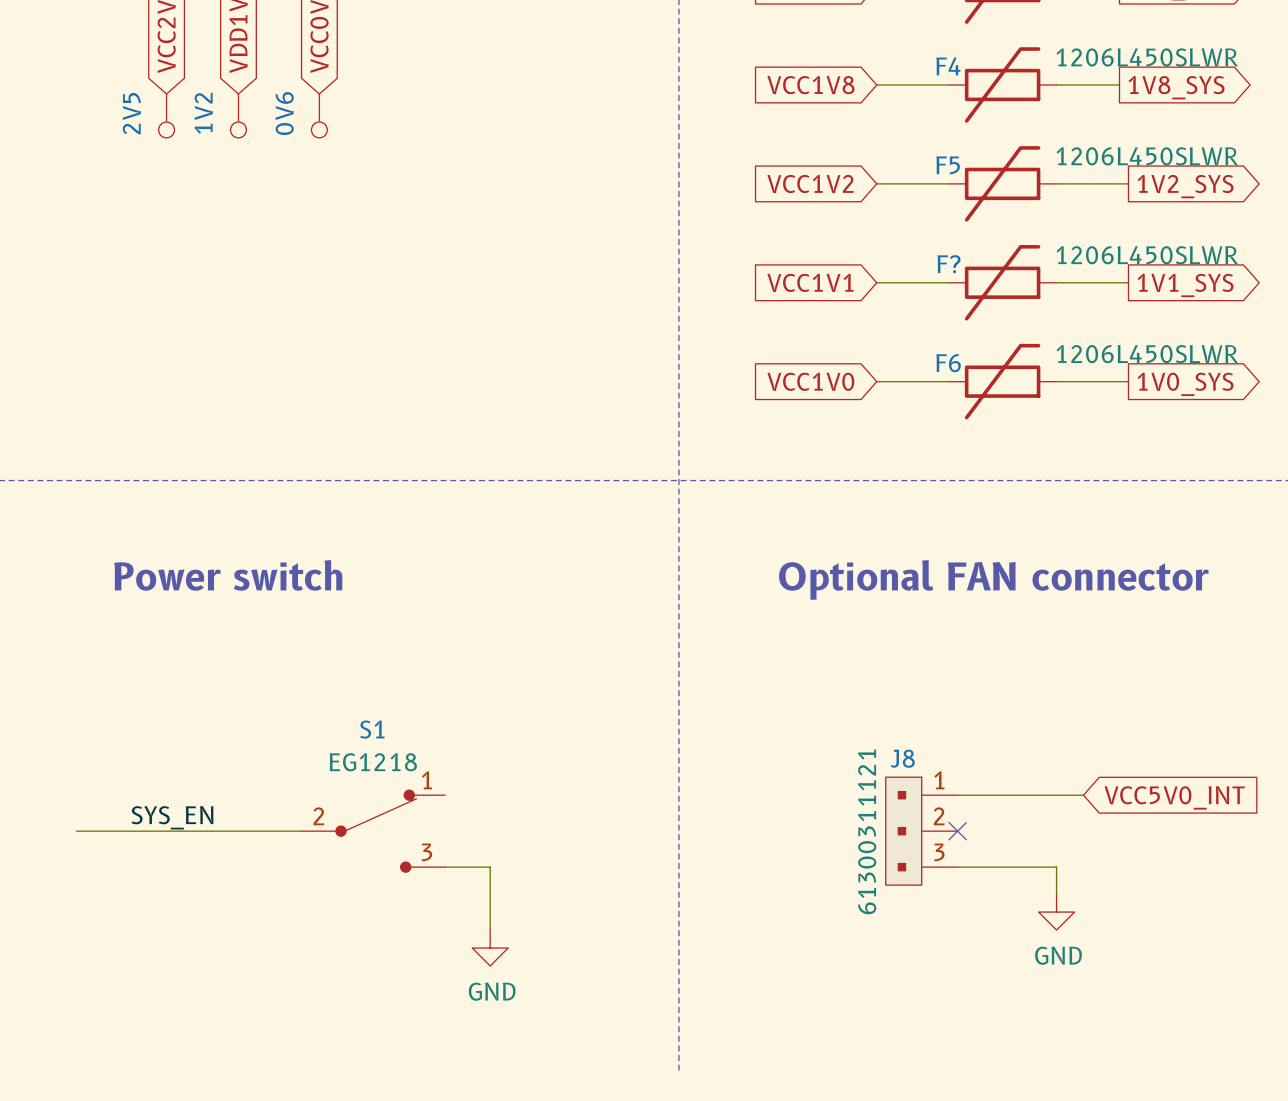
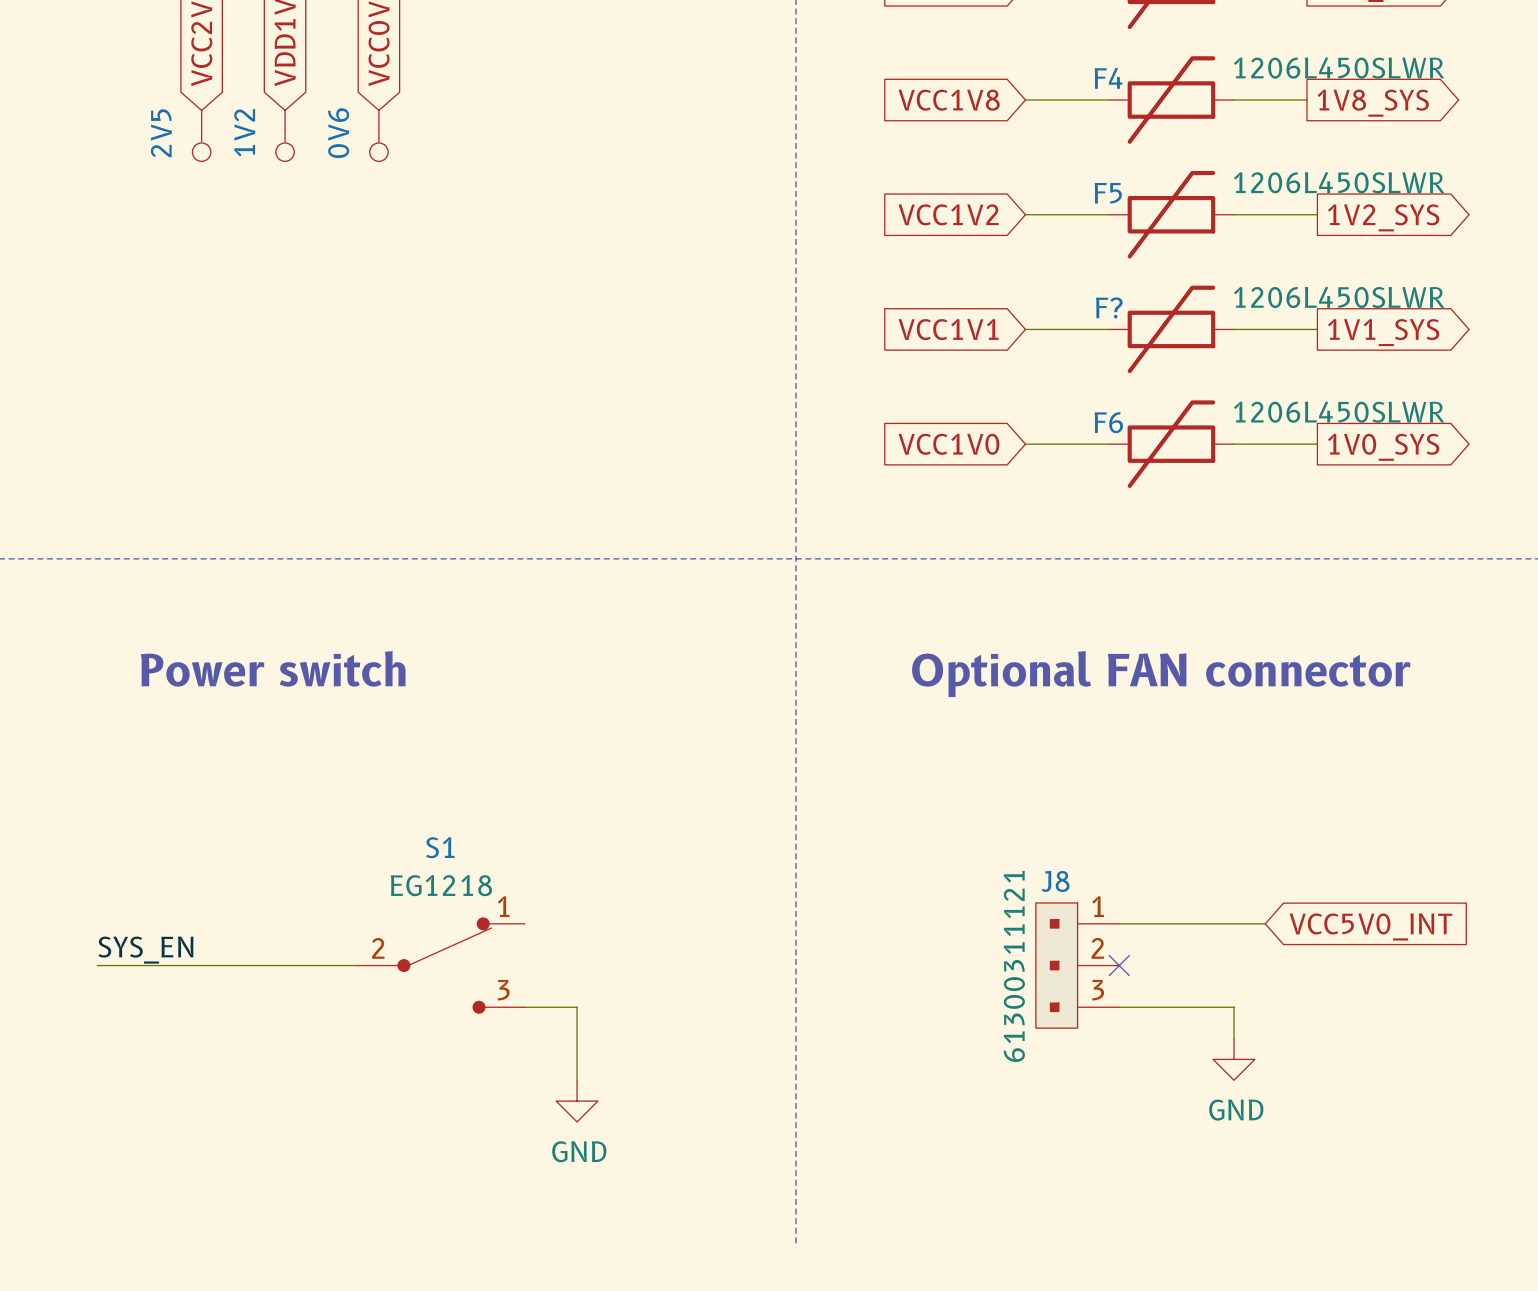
label position: SYS_EN (172, 817) -> SYS_EN (145, 950)

